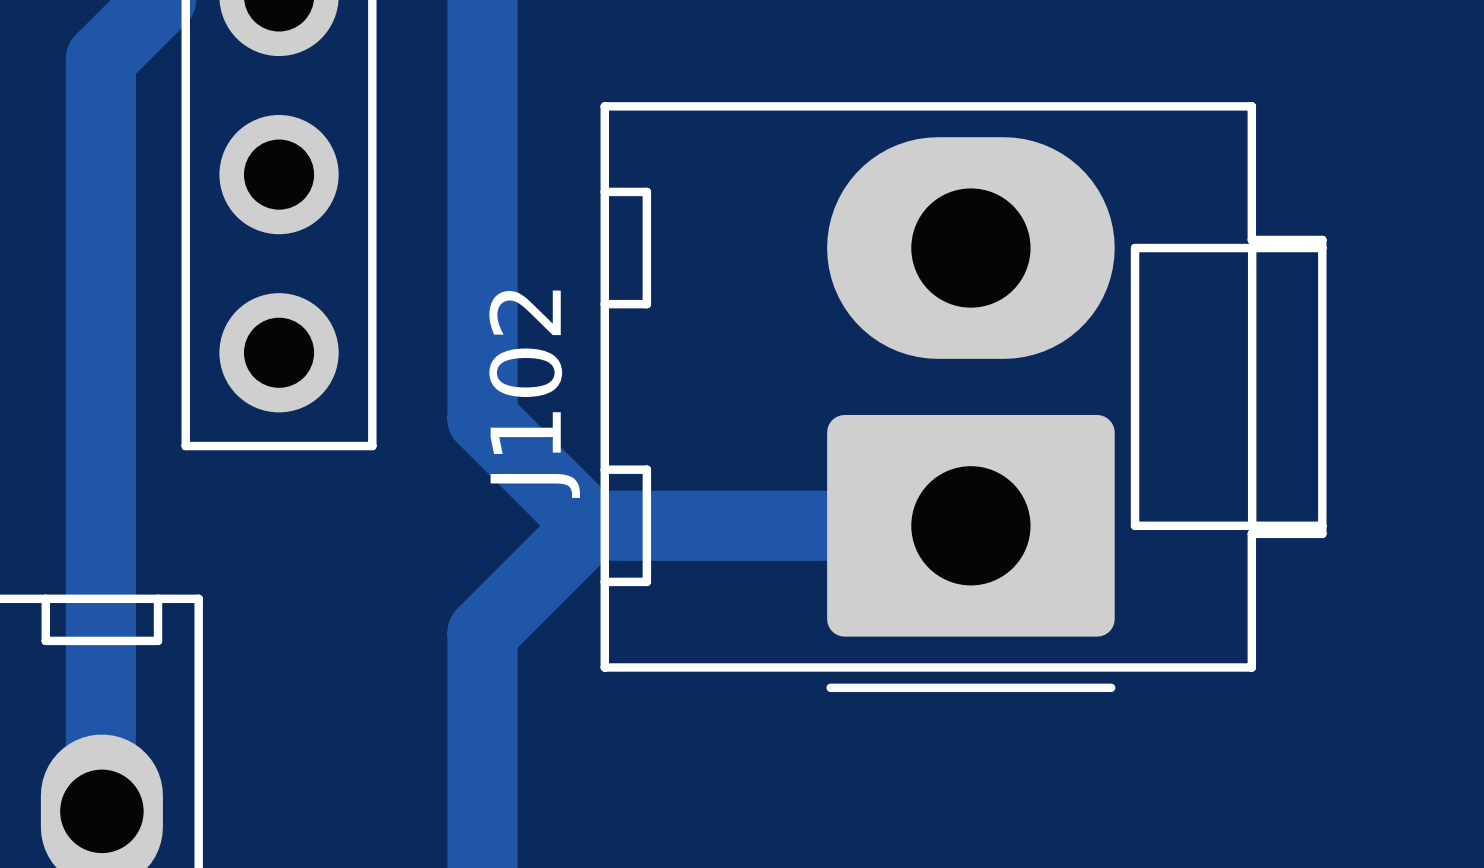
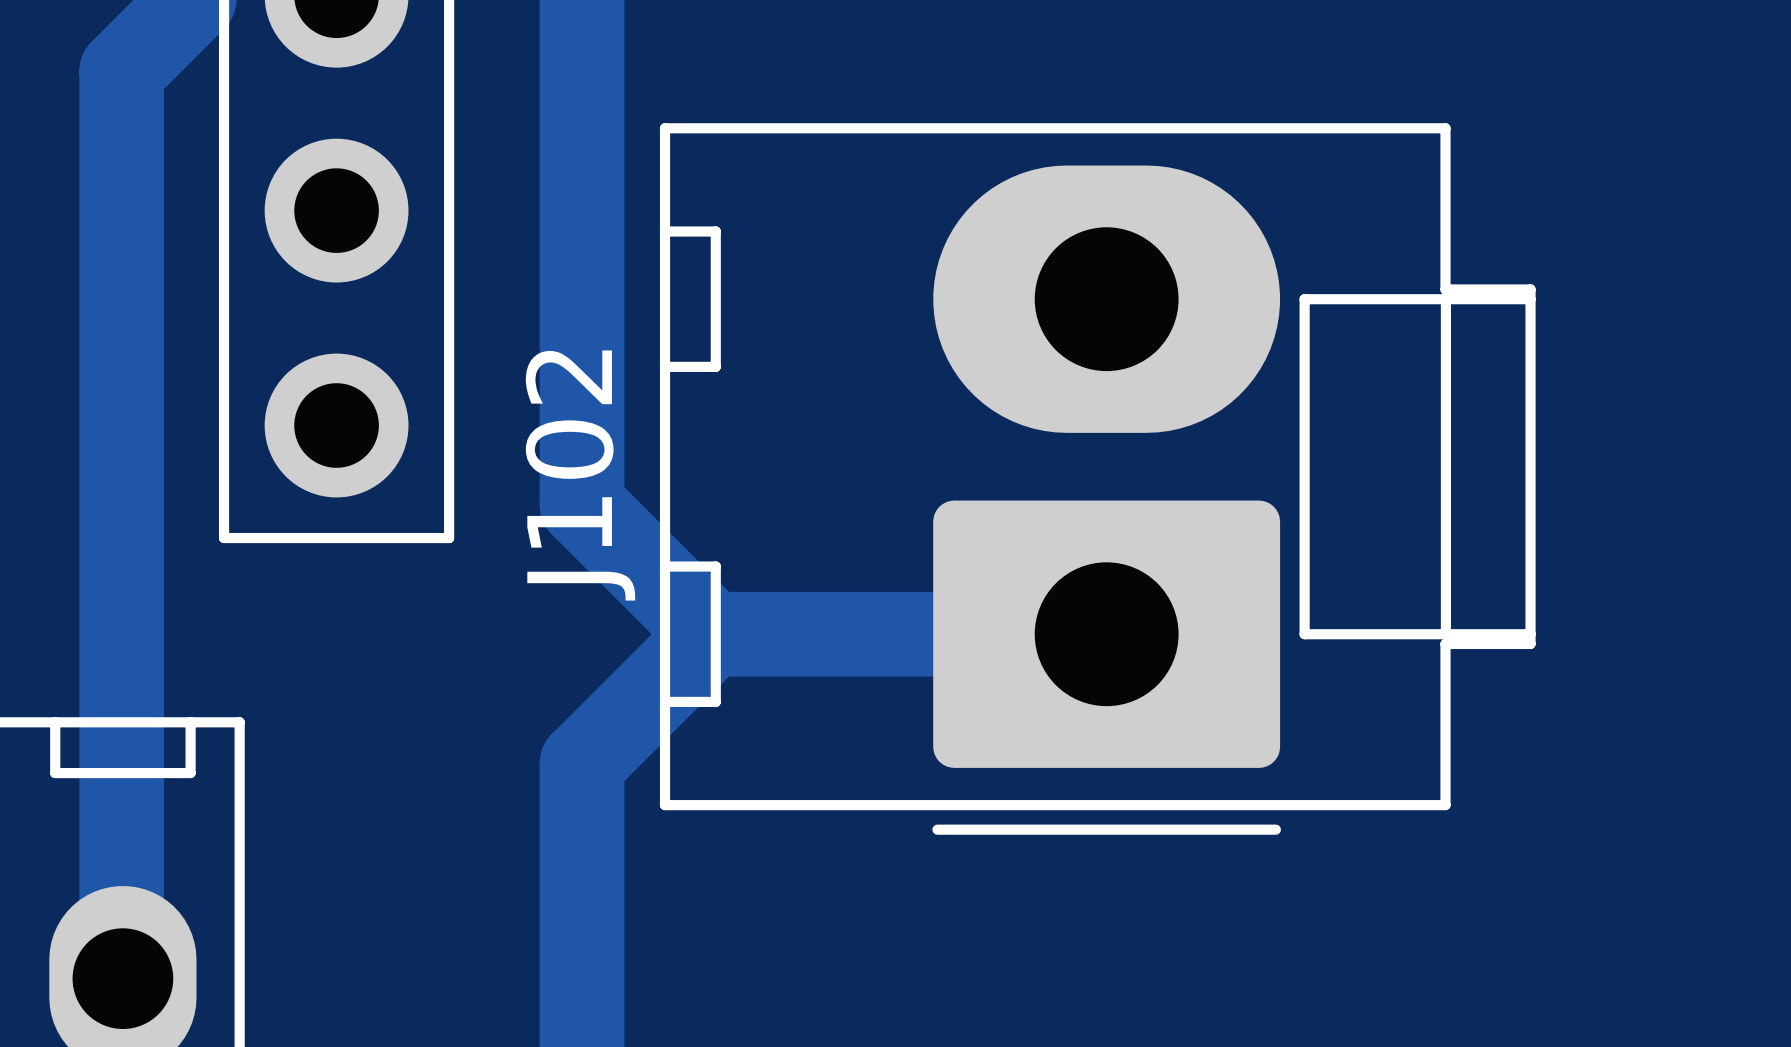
J102 position: (963, 397) -> (1097, 478)

